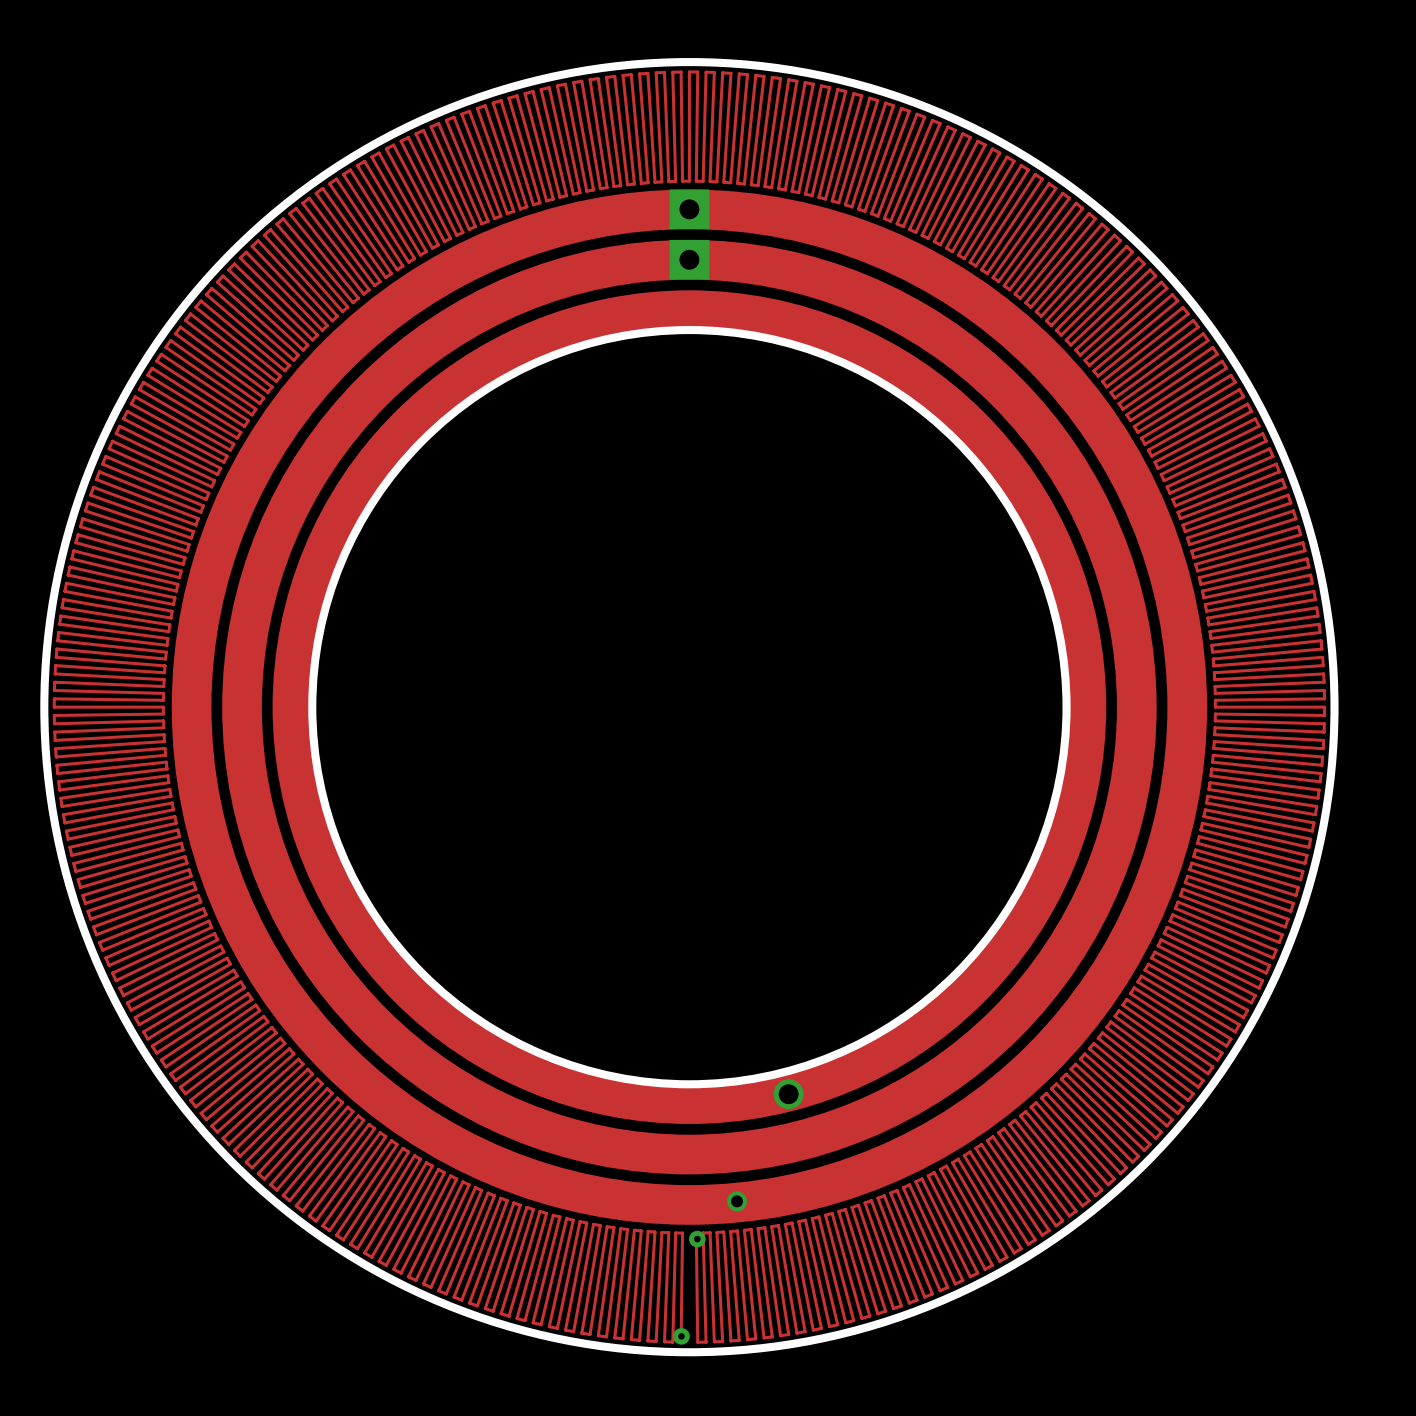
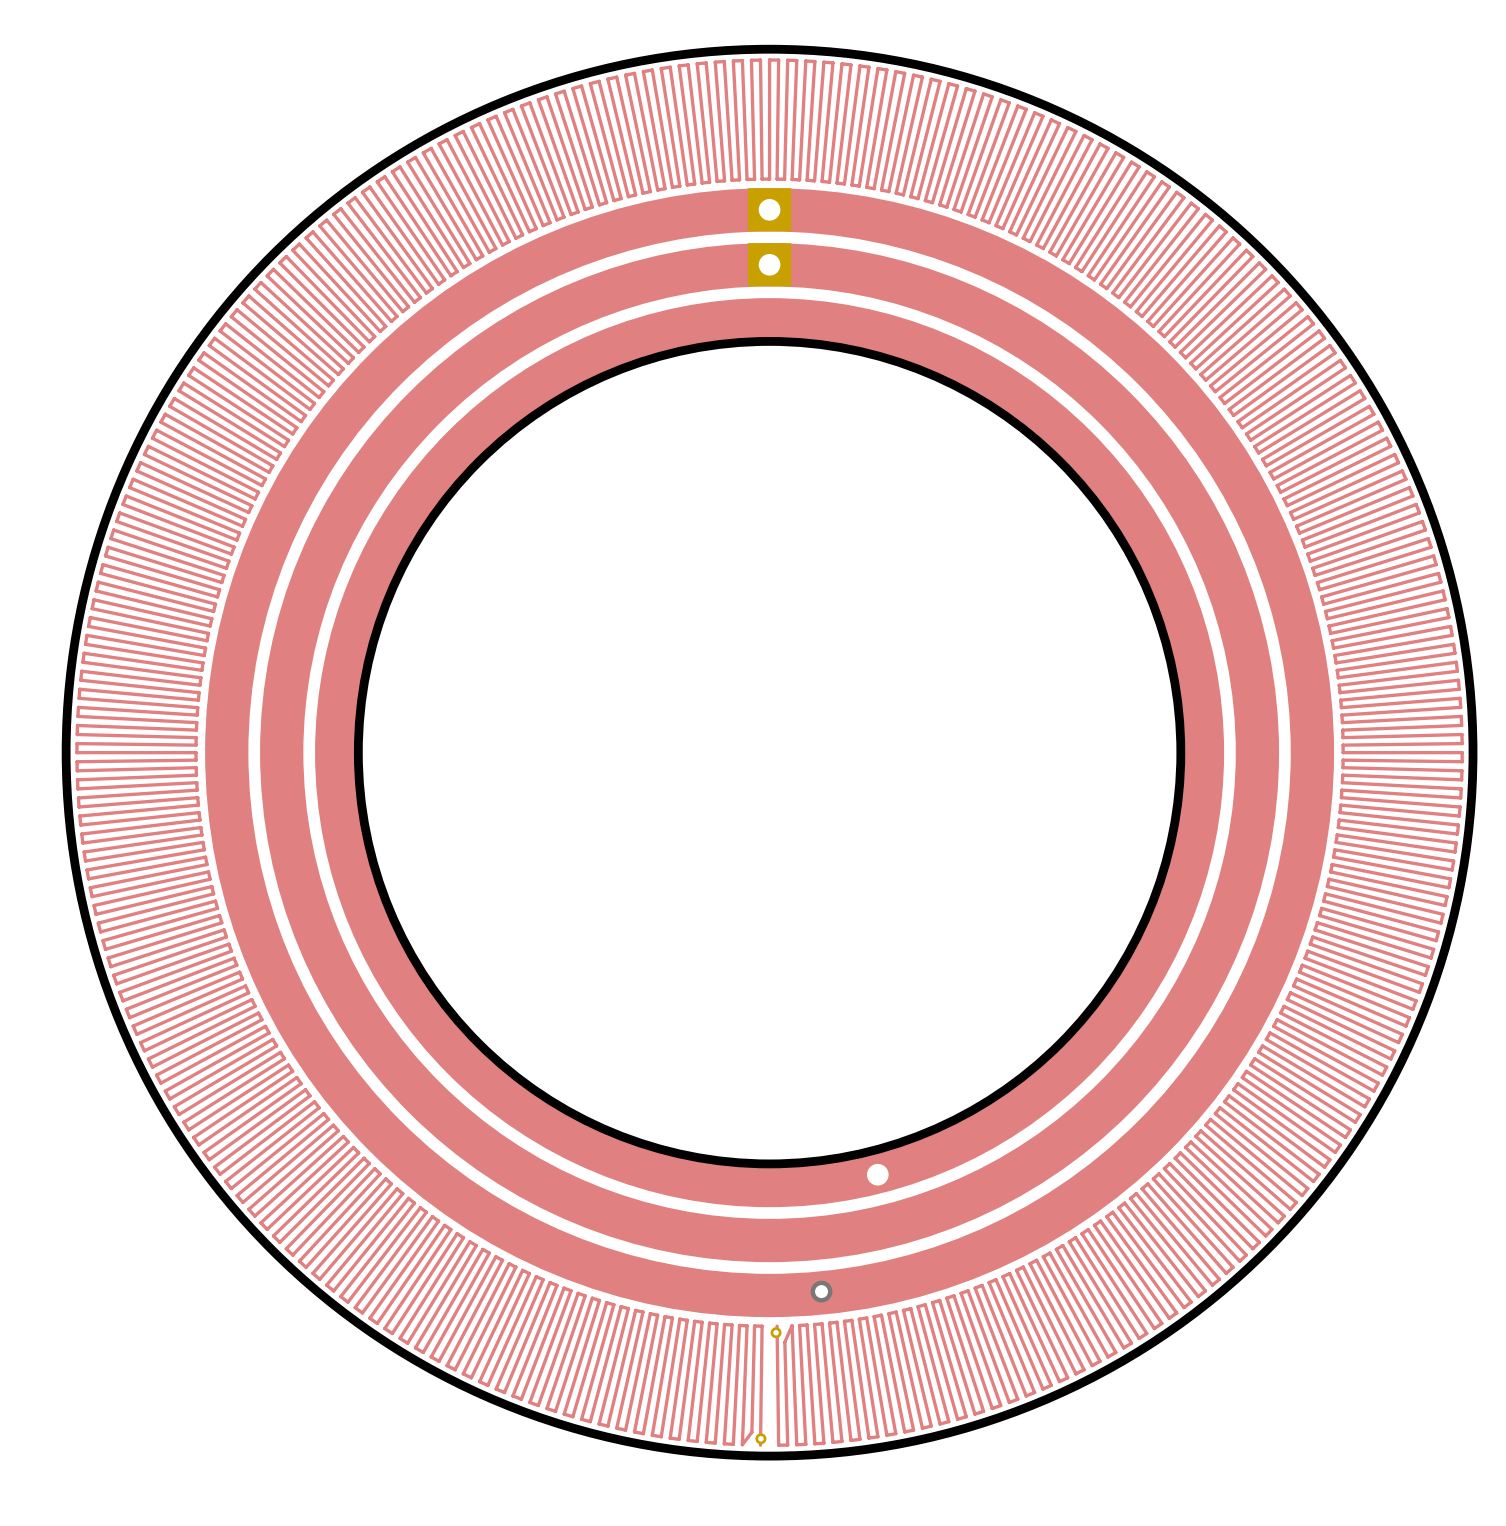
part footprint: [52, 70, 1327, 1345] -> [75, 58, 1464, 1447]

